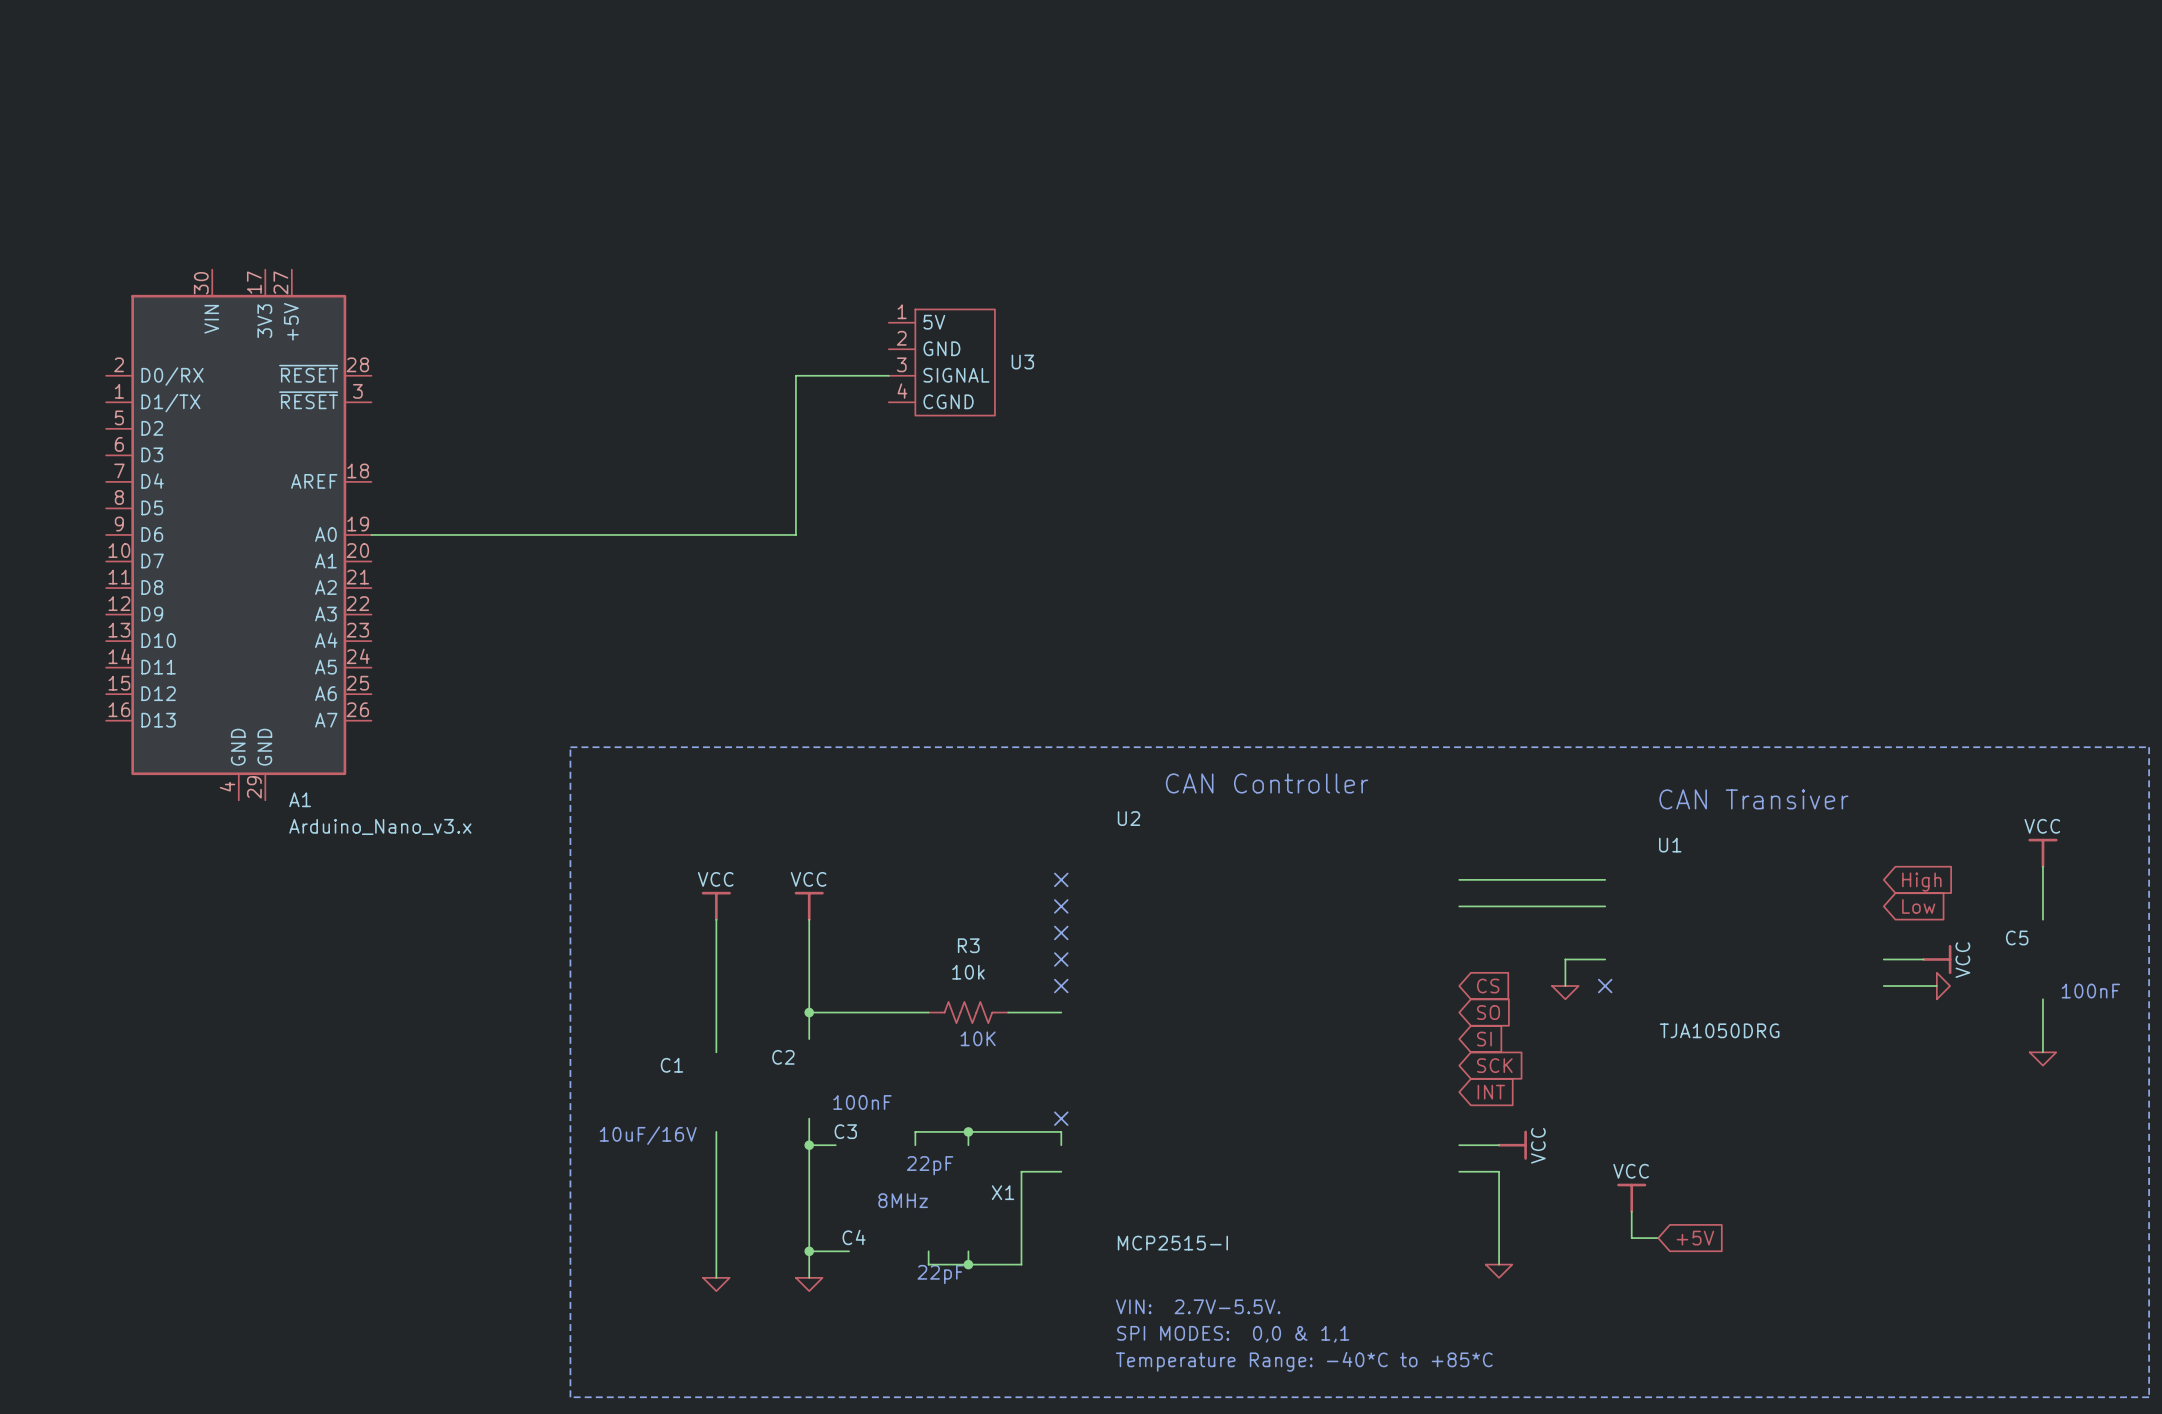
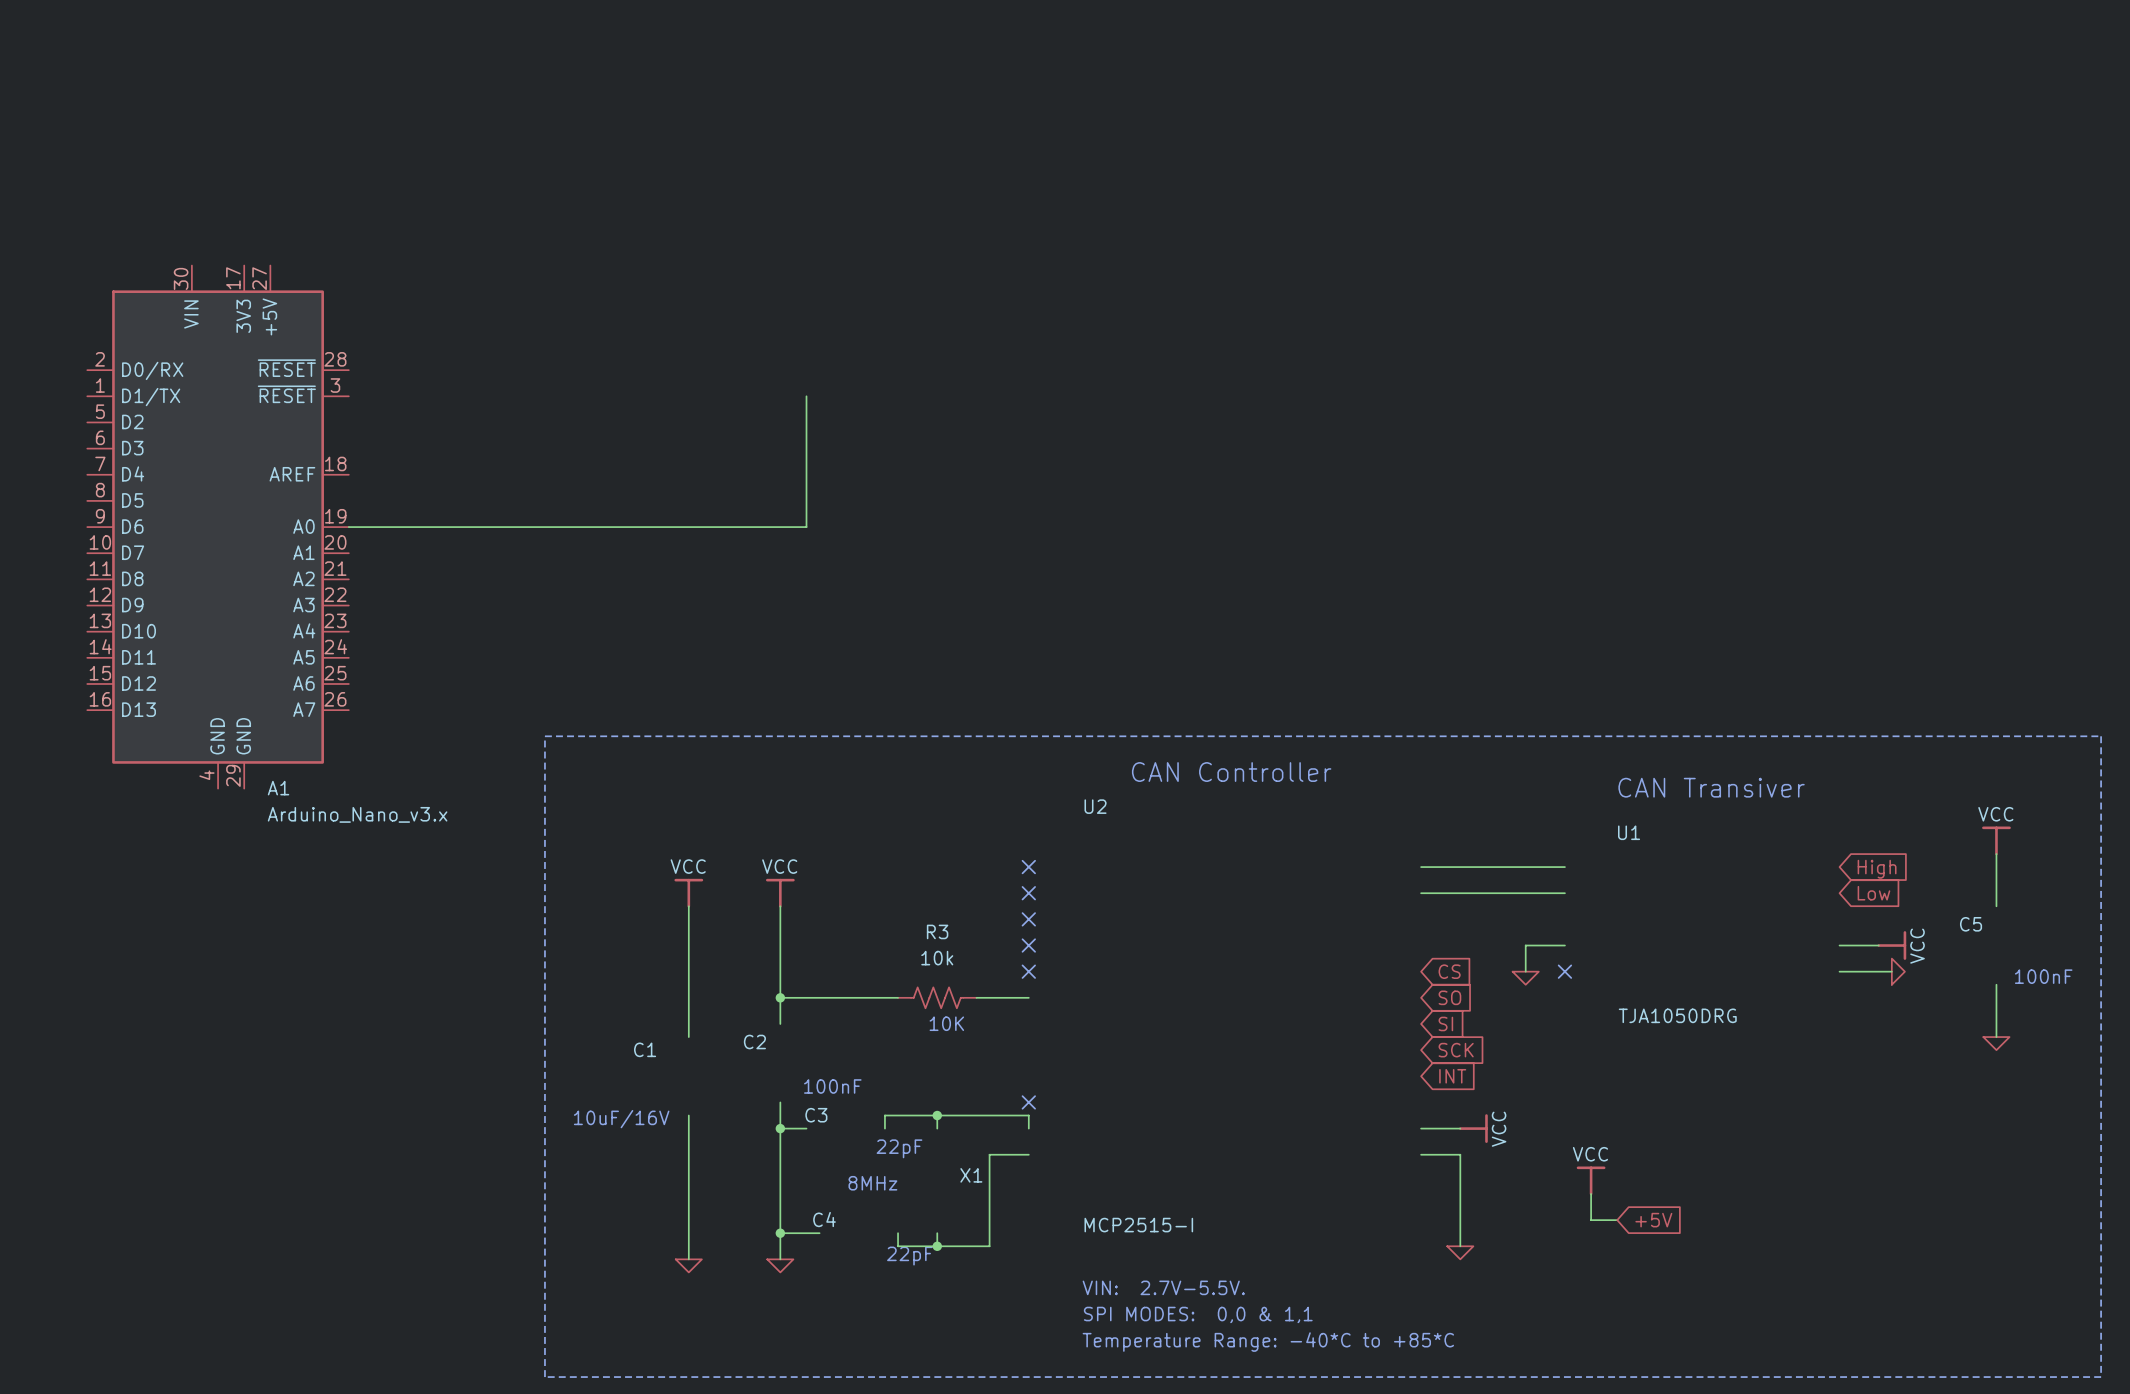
U3: (941, 362) -> none
wire: (888, 375) (795, 375) (795, 534) -> (806, 396) (806, 527) (767, 527)

